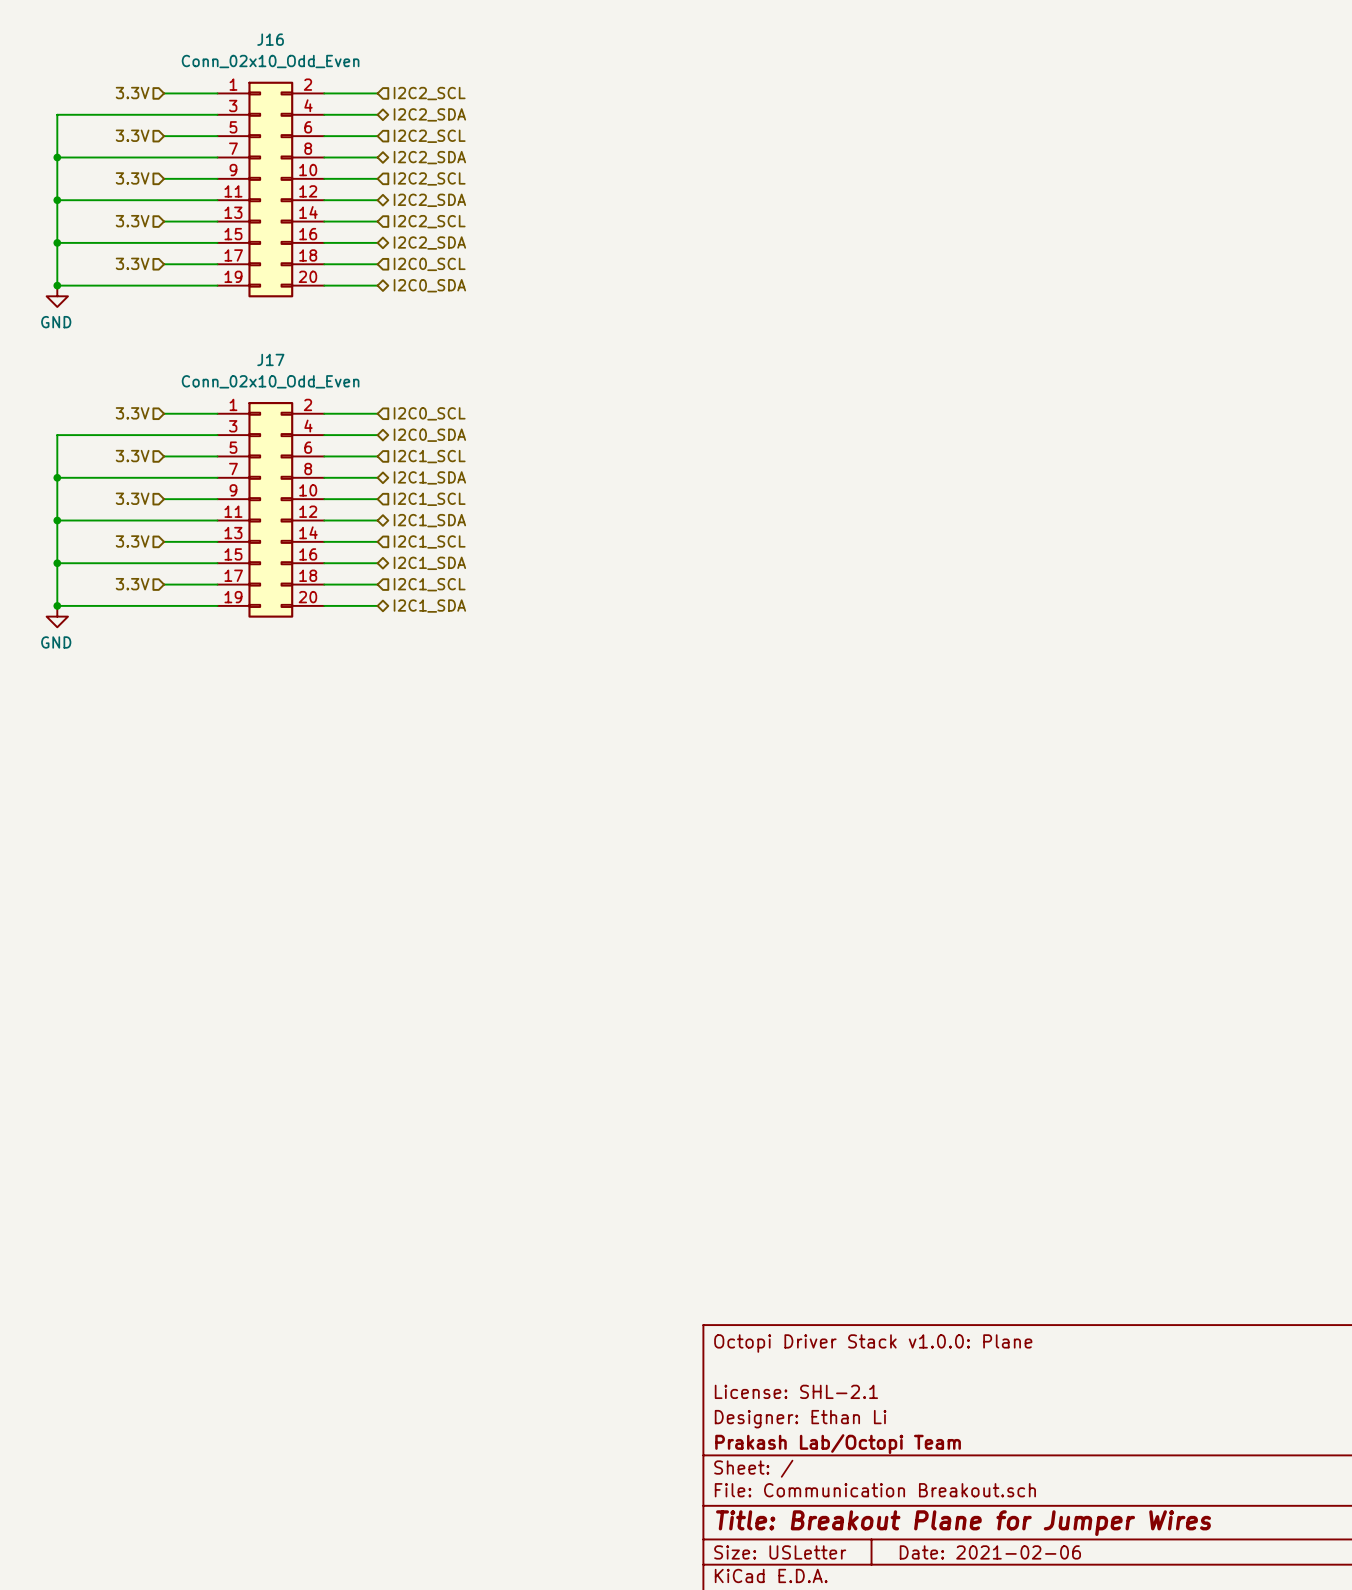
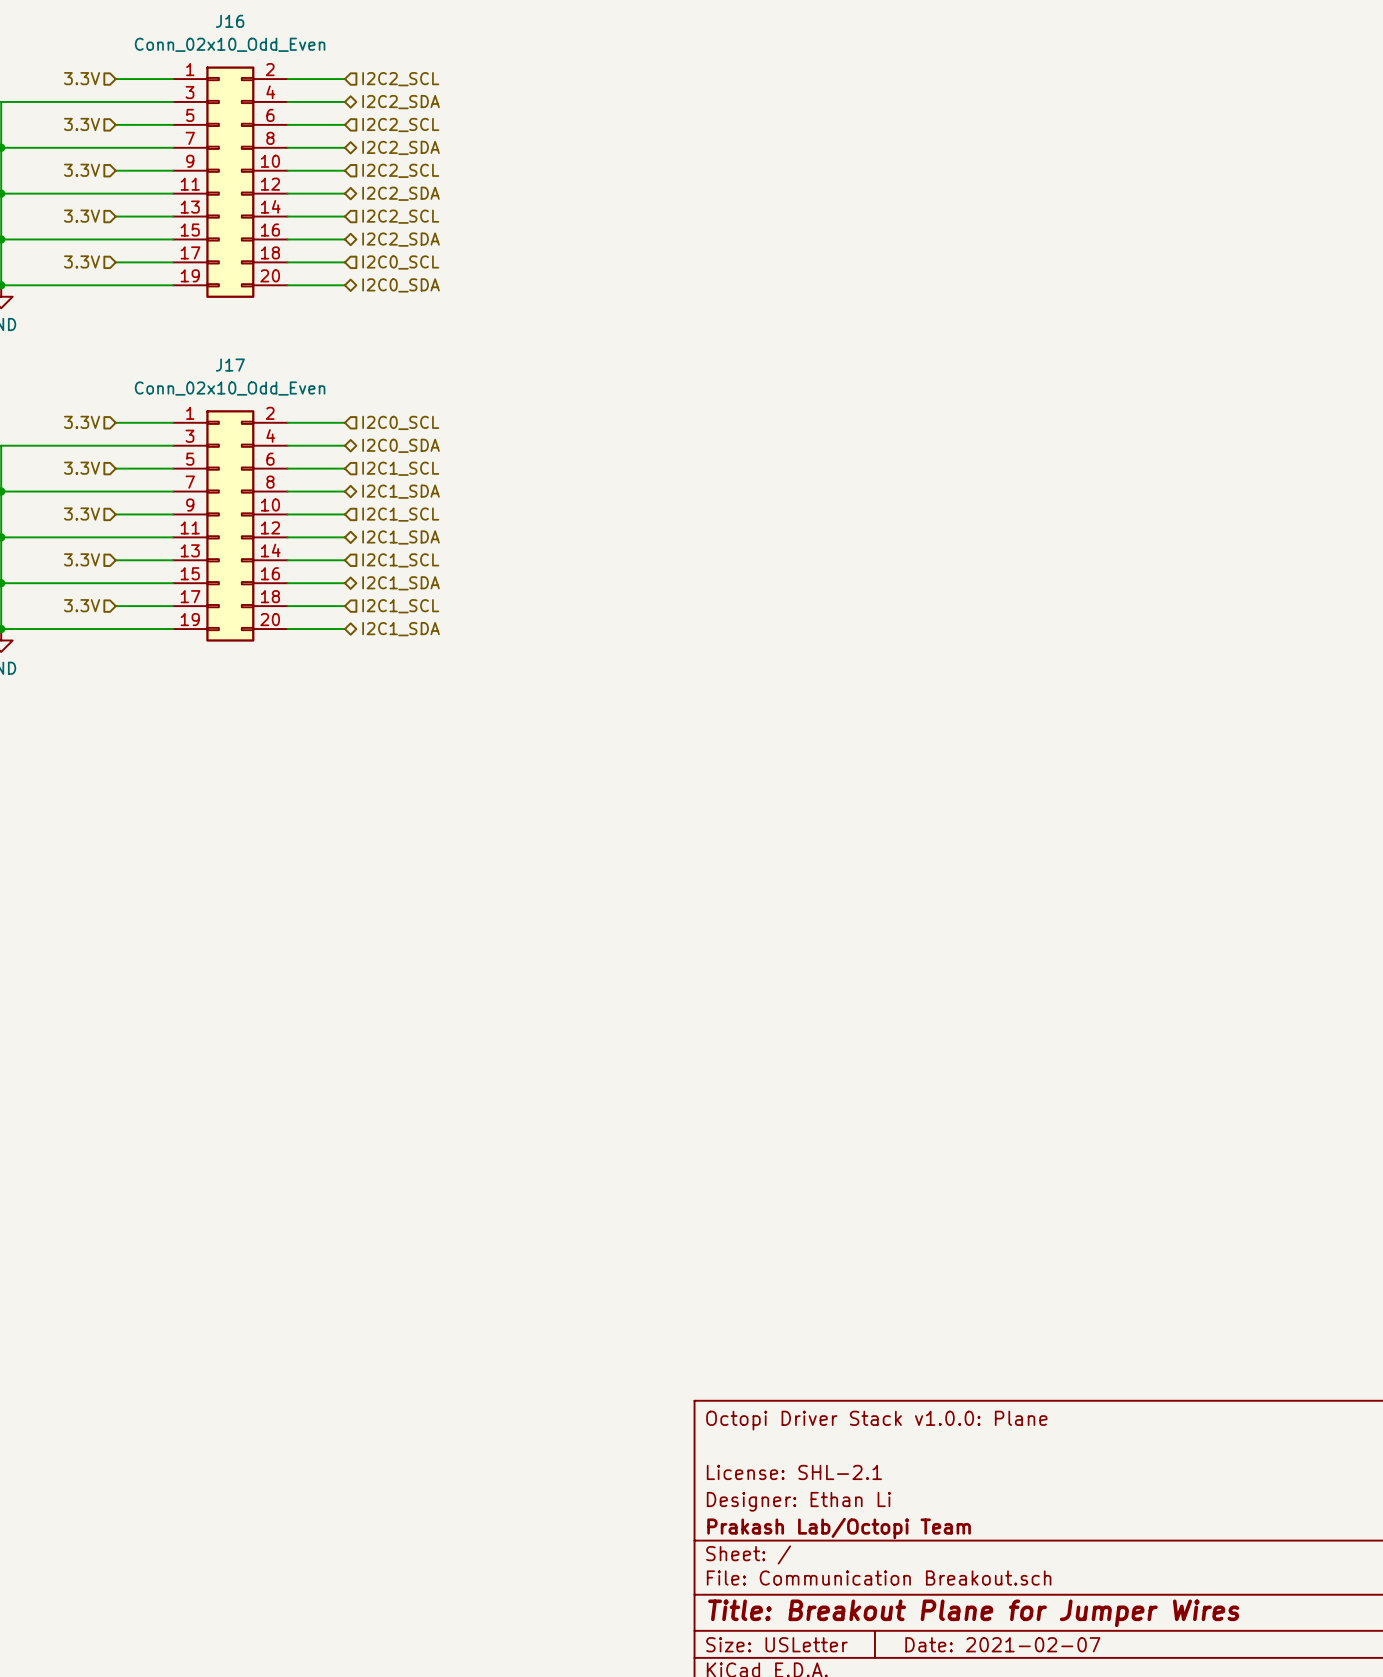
title block: Date: 2021-02-06 (990, 1552) -> Date: 2021-02-07 (1002, 1644)

